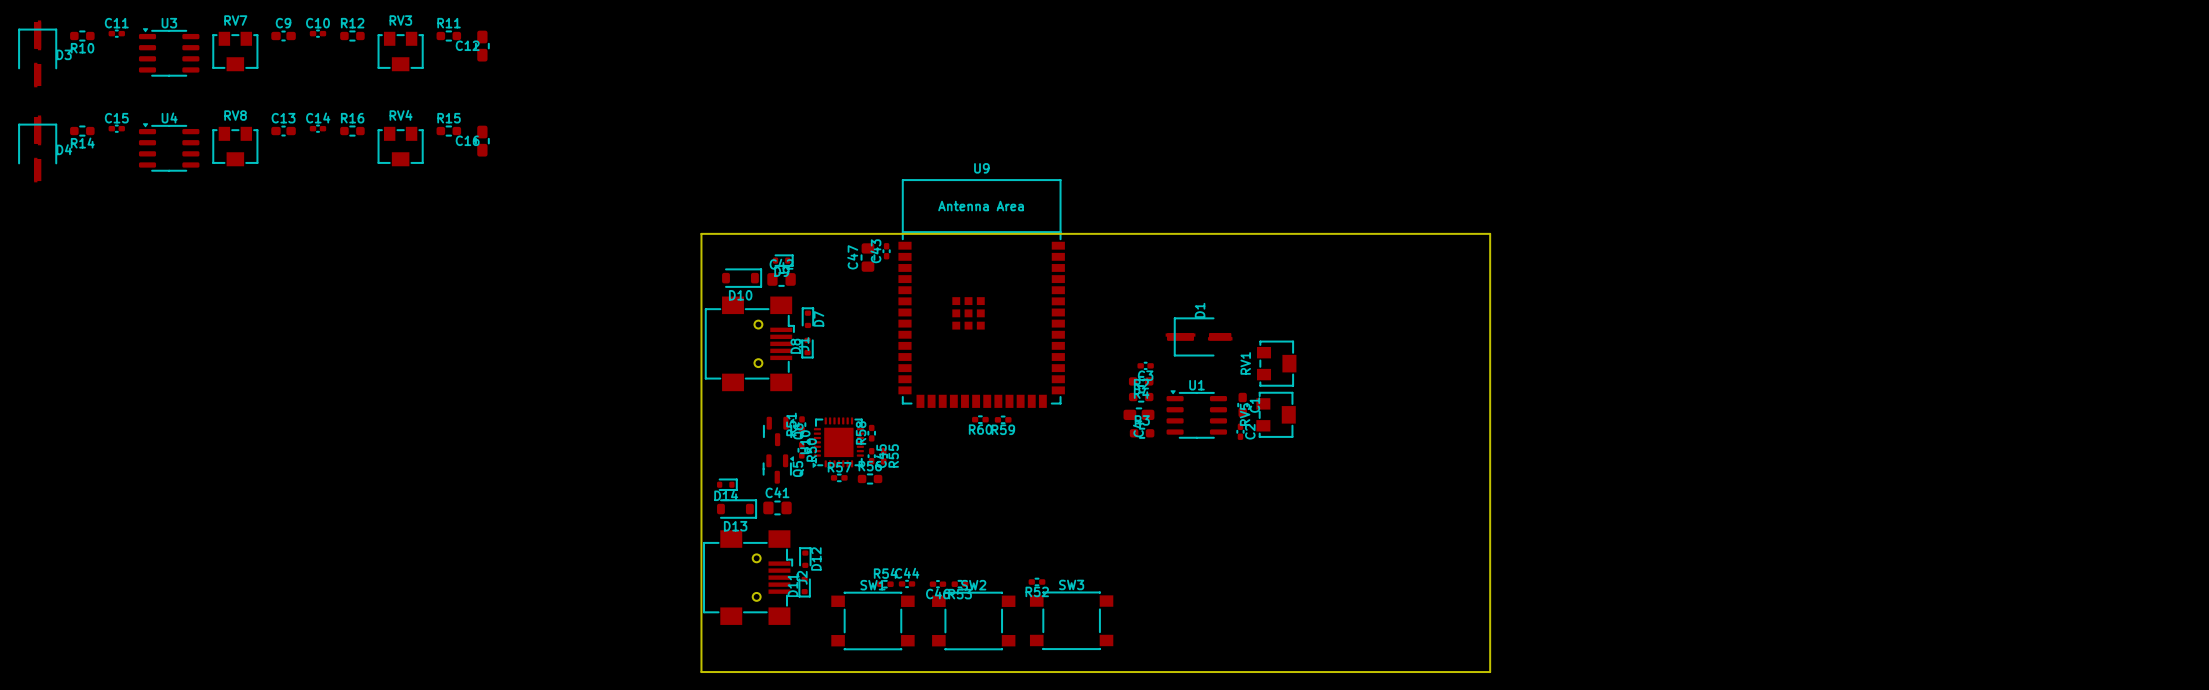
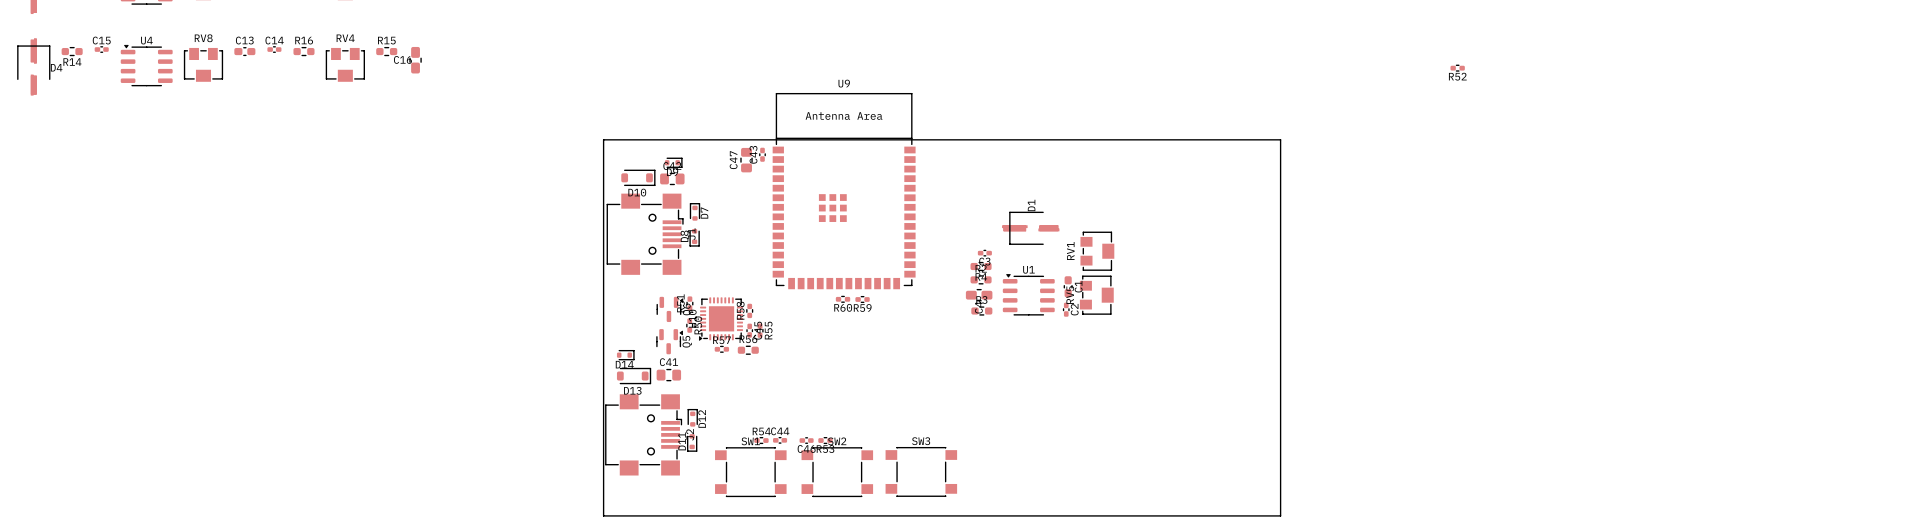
R52 position: (1037, 581) -> (1457, 68)

